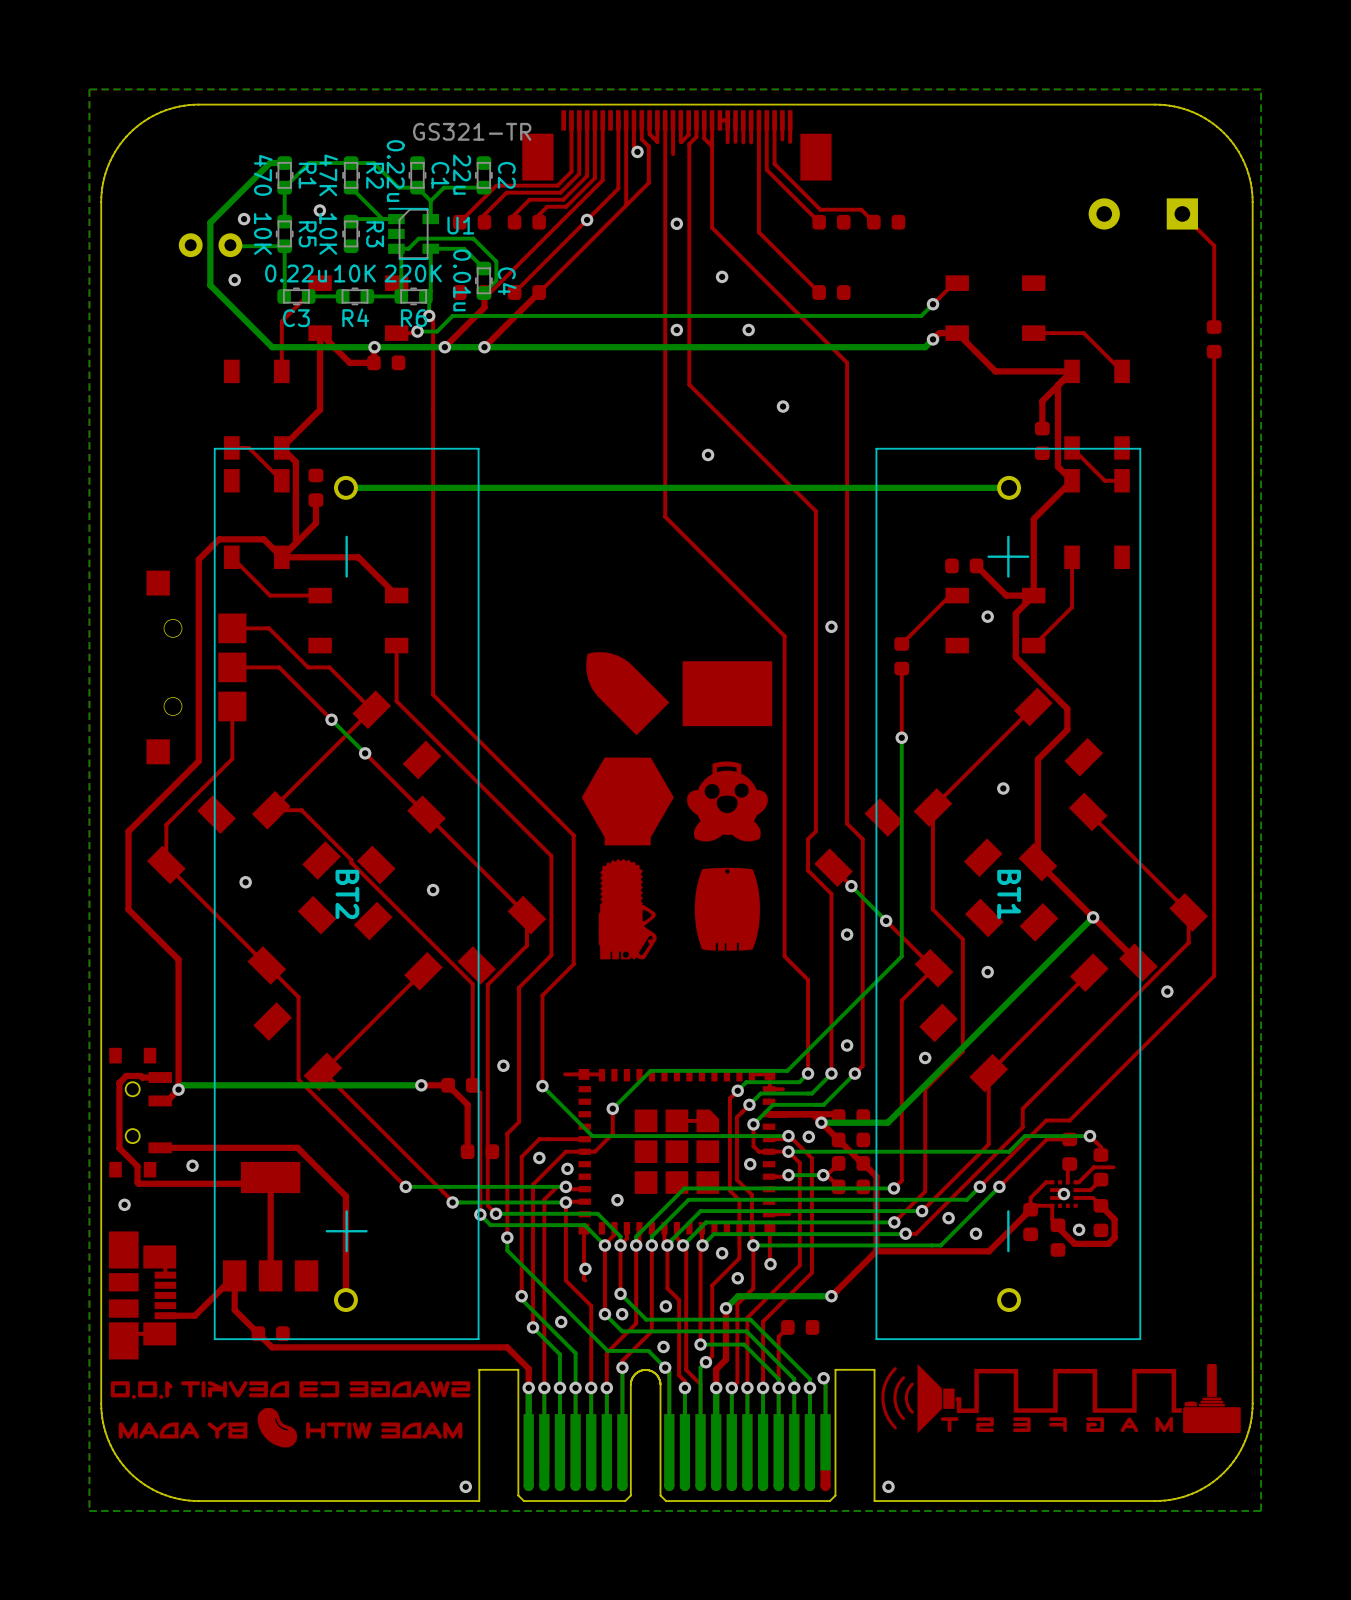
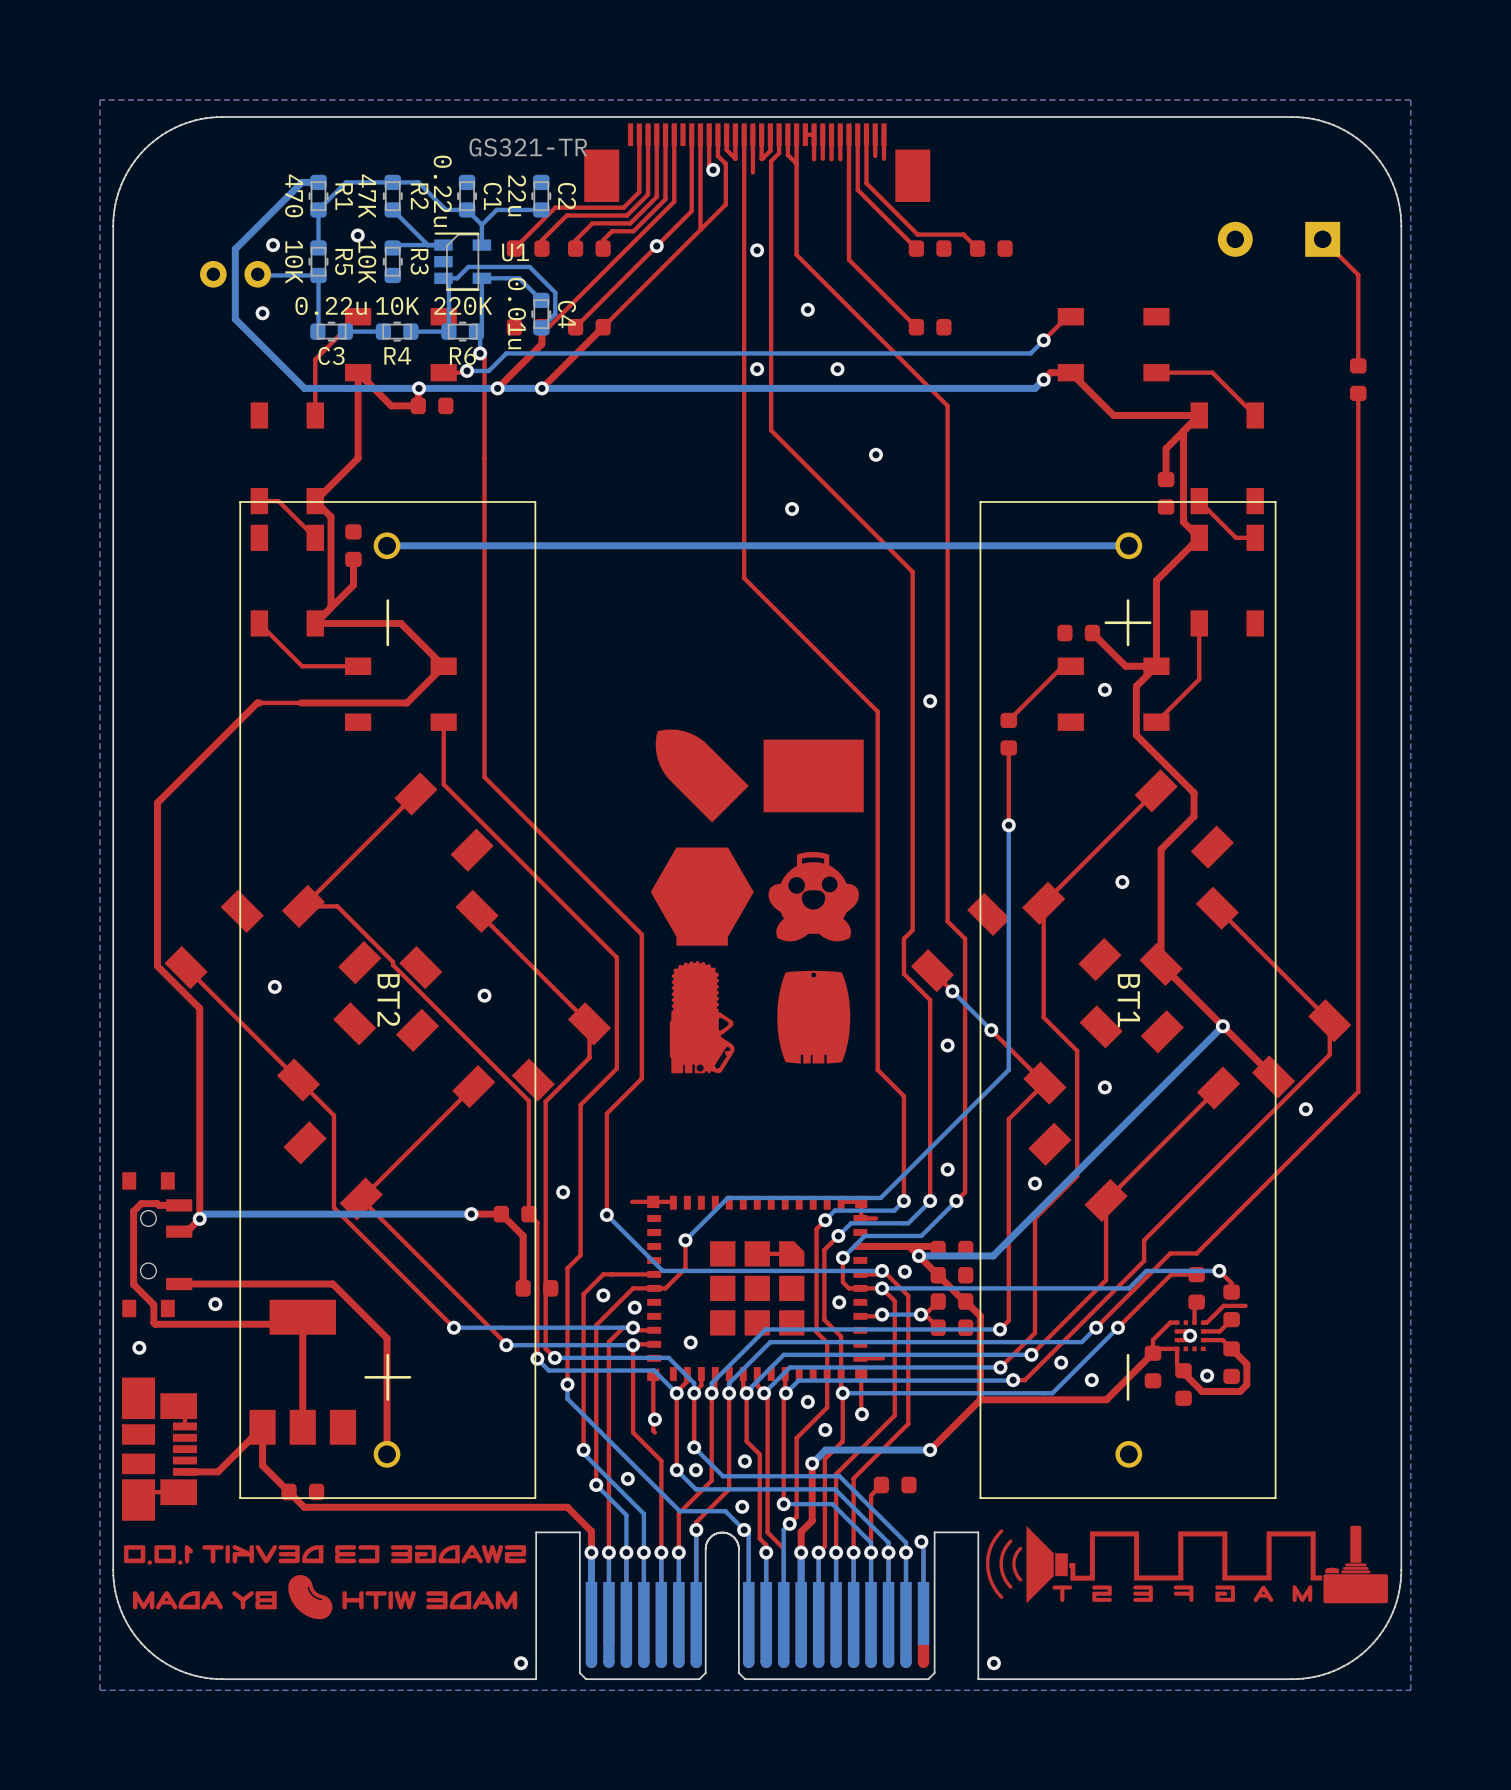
top track: (281, 557) (263, 539) (219, 539) (198, 559) (198, 761) (128, 831) (128, 909) (178, 959) -> (259, 702) (257, 702) (157, 802) (157, 966) (199, 1008) (199, 1073)
top track: (269, 628) (308, 667) (329, 667) (371, 709) -> (301, 702) (407, 702) (443, 666)
part: (196, 667) -> none
top track: (232, 667) (279, 667) (331, 719) -> none
top track: (232, 706) (232, 758) (166, 824) (166, 864) -> none
bottom track: (331, 719) (365, 753) -> none
via: (331, 719) -> none
top track: (365, 753) (426, 814) -> none
via: (365, 753) -> none

